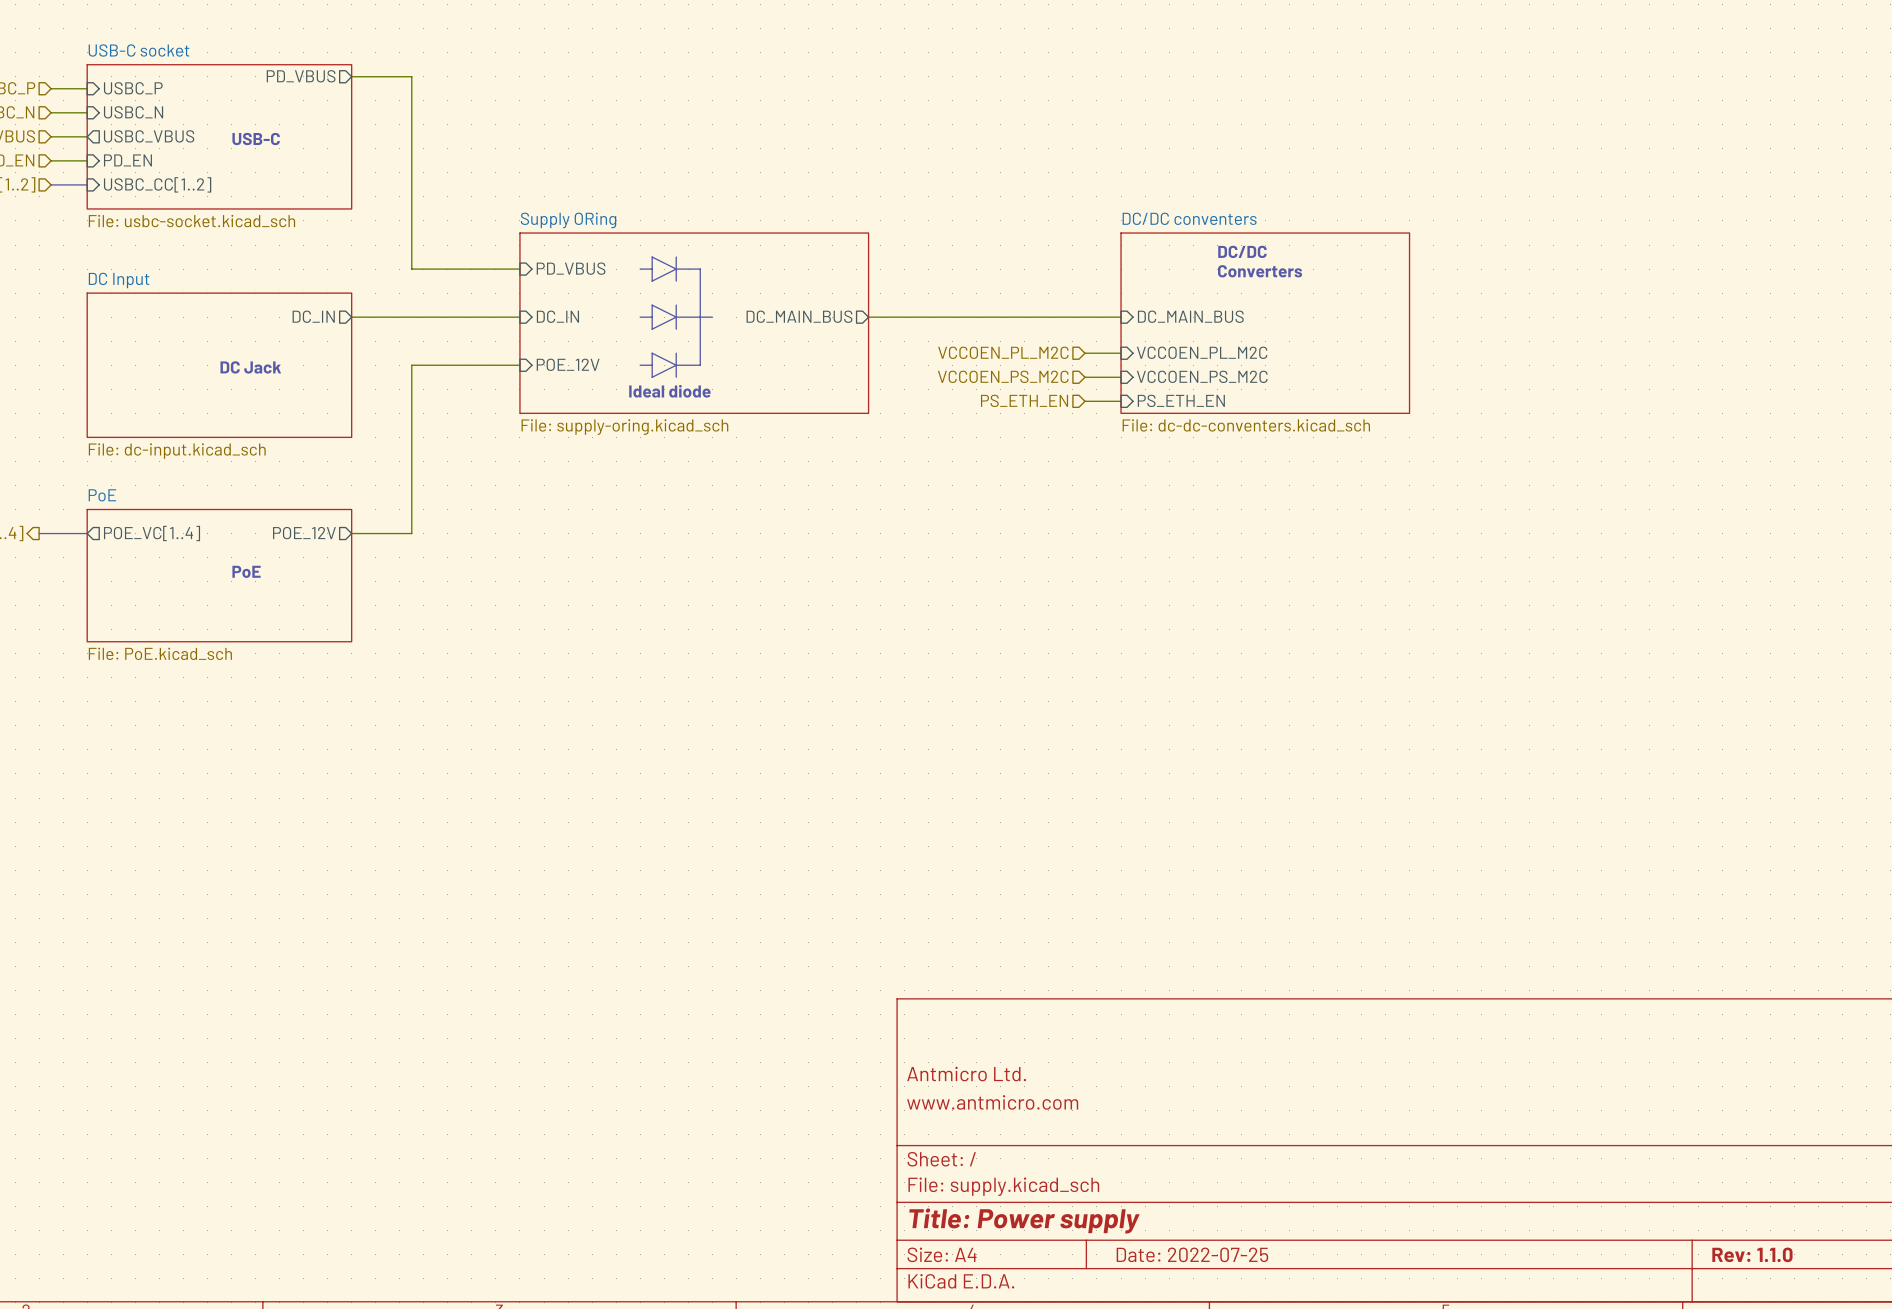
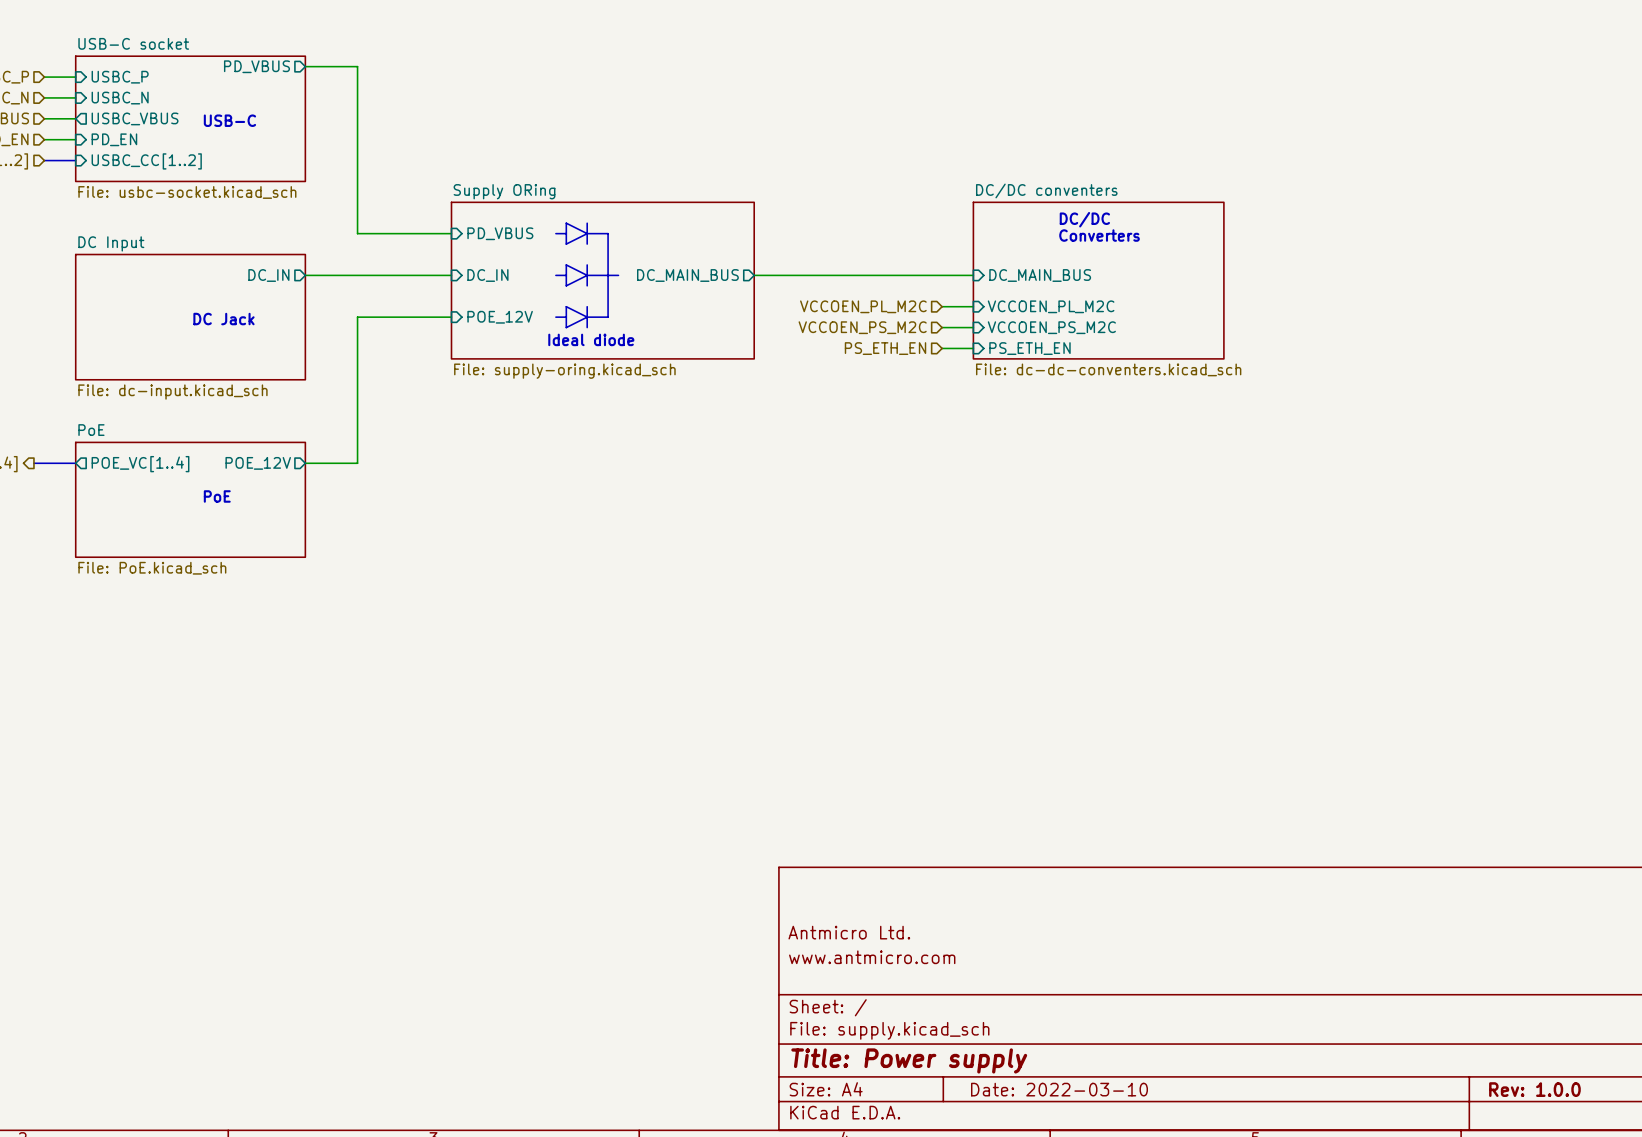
title block: Date: 2022-07-25 (1192, 1254) -> Date: 2022-03-10 (1059, 1089)
title block: Rev: 1.1.0 (1752, 1254) -> Rev: 1.0.0 (1534, 1089)

